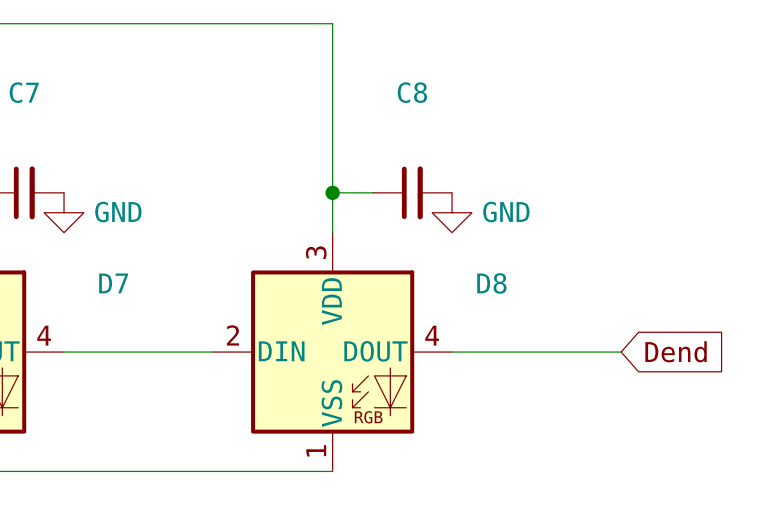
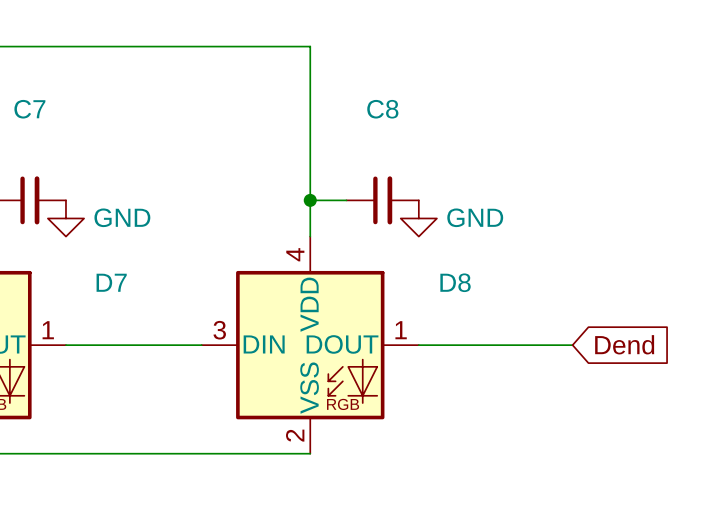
D8 pin number: 3 (316, 252) -> 4 (295, 254)
D7 pin number: 4 (44, 335) -> 1 (48, 330)
D8 pin number: 2 (233, 335) -> 3 (219, 330)
D8 pin number: 4 (432, 335) -> 1 (401, 330)
D8 pin number: 1 (316, 450) -> 2 (295, 435)

